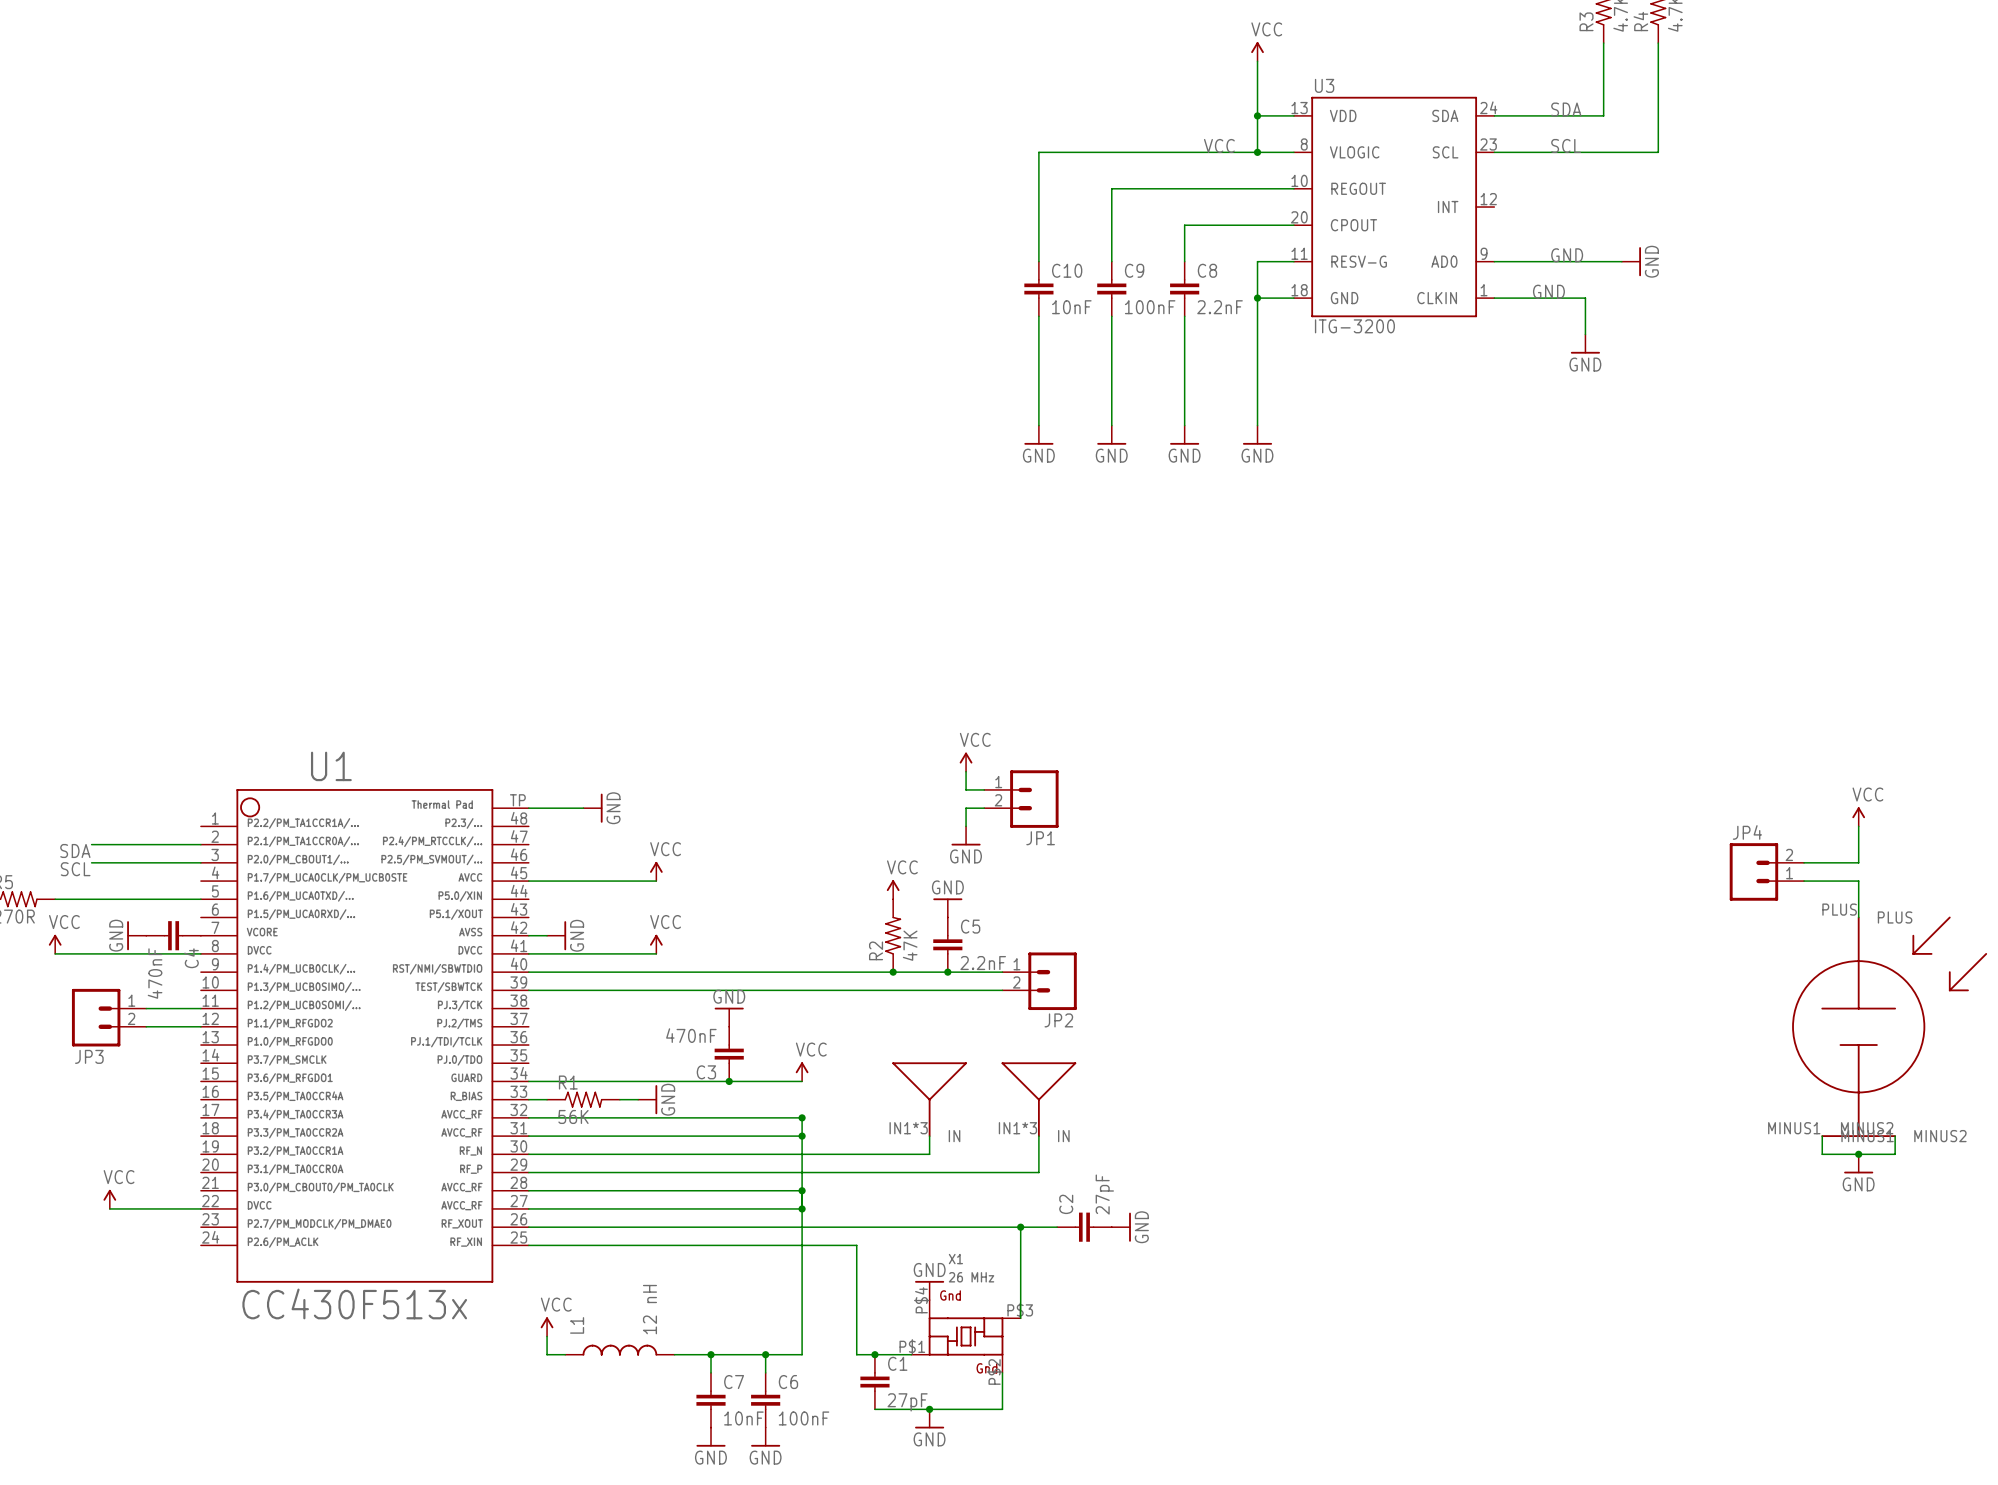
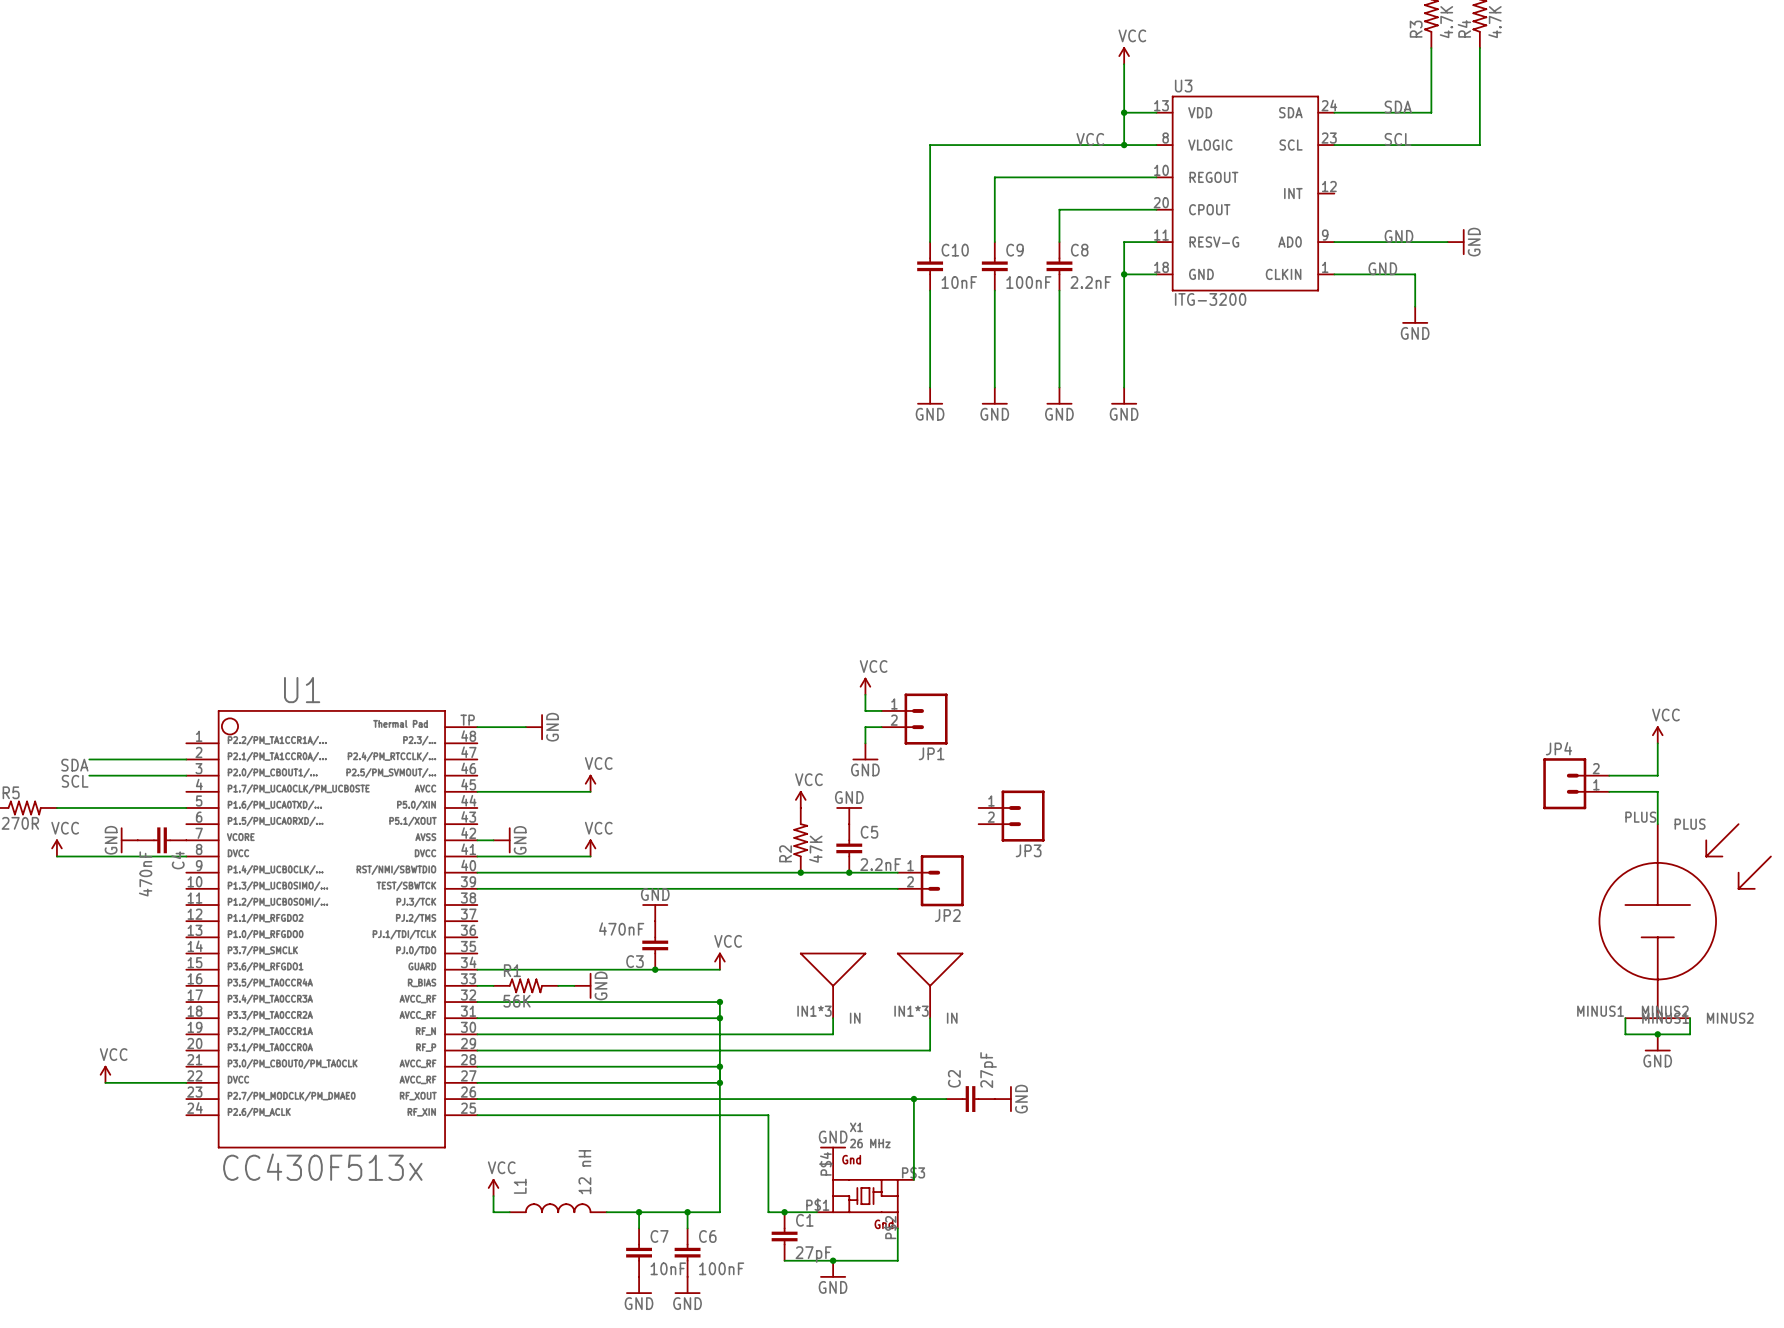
wire: (146, 1008) (200, 1008) -> none
JP3 flip: as is (96, 1017) -> left-right (1023, 816)
JP3 position: (109, 1017) -> (1011, 816)
wire: (146, 1026) (200, 1026) -> none

